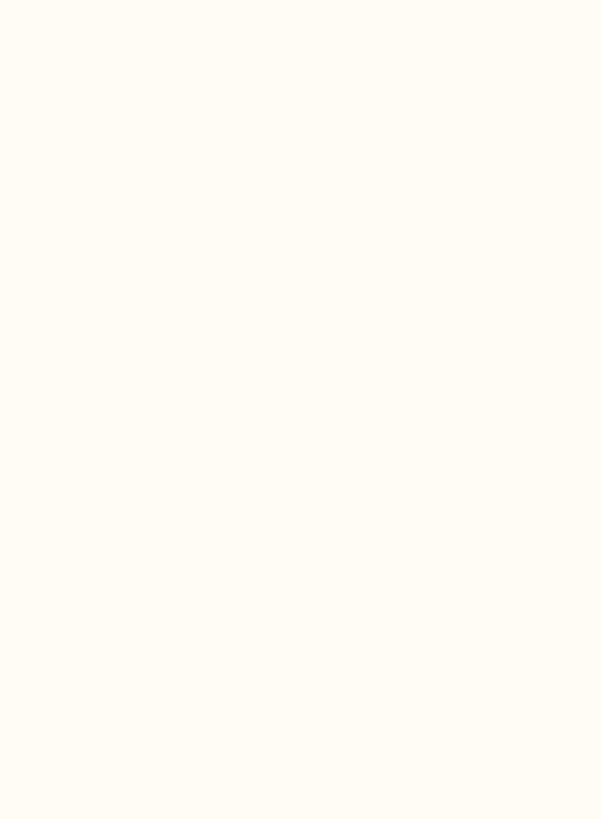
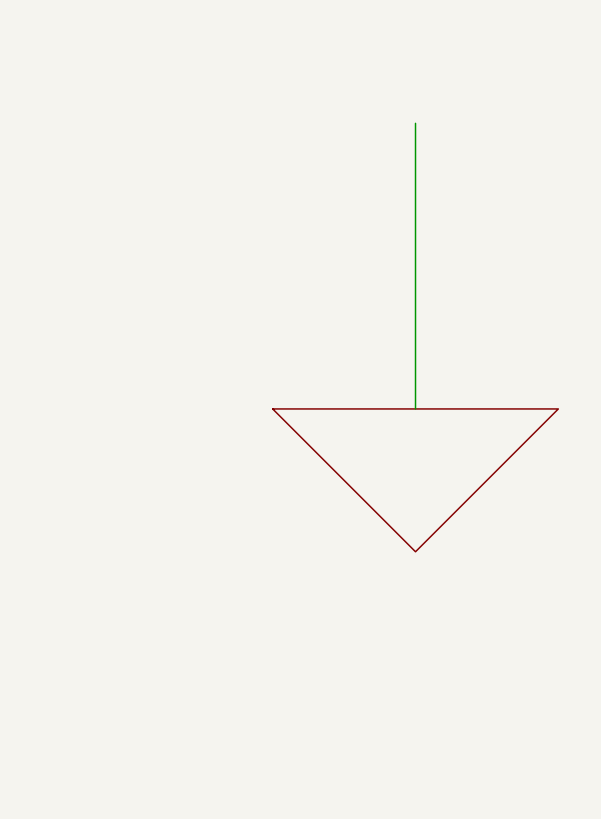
wire: none -> (415, 123) (415, 408)
power symbol: none -> (415, 480)

